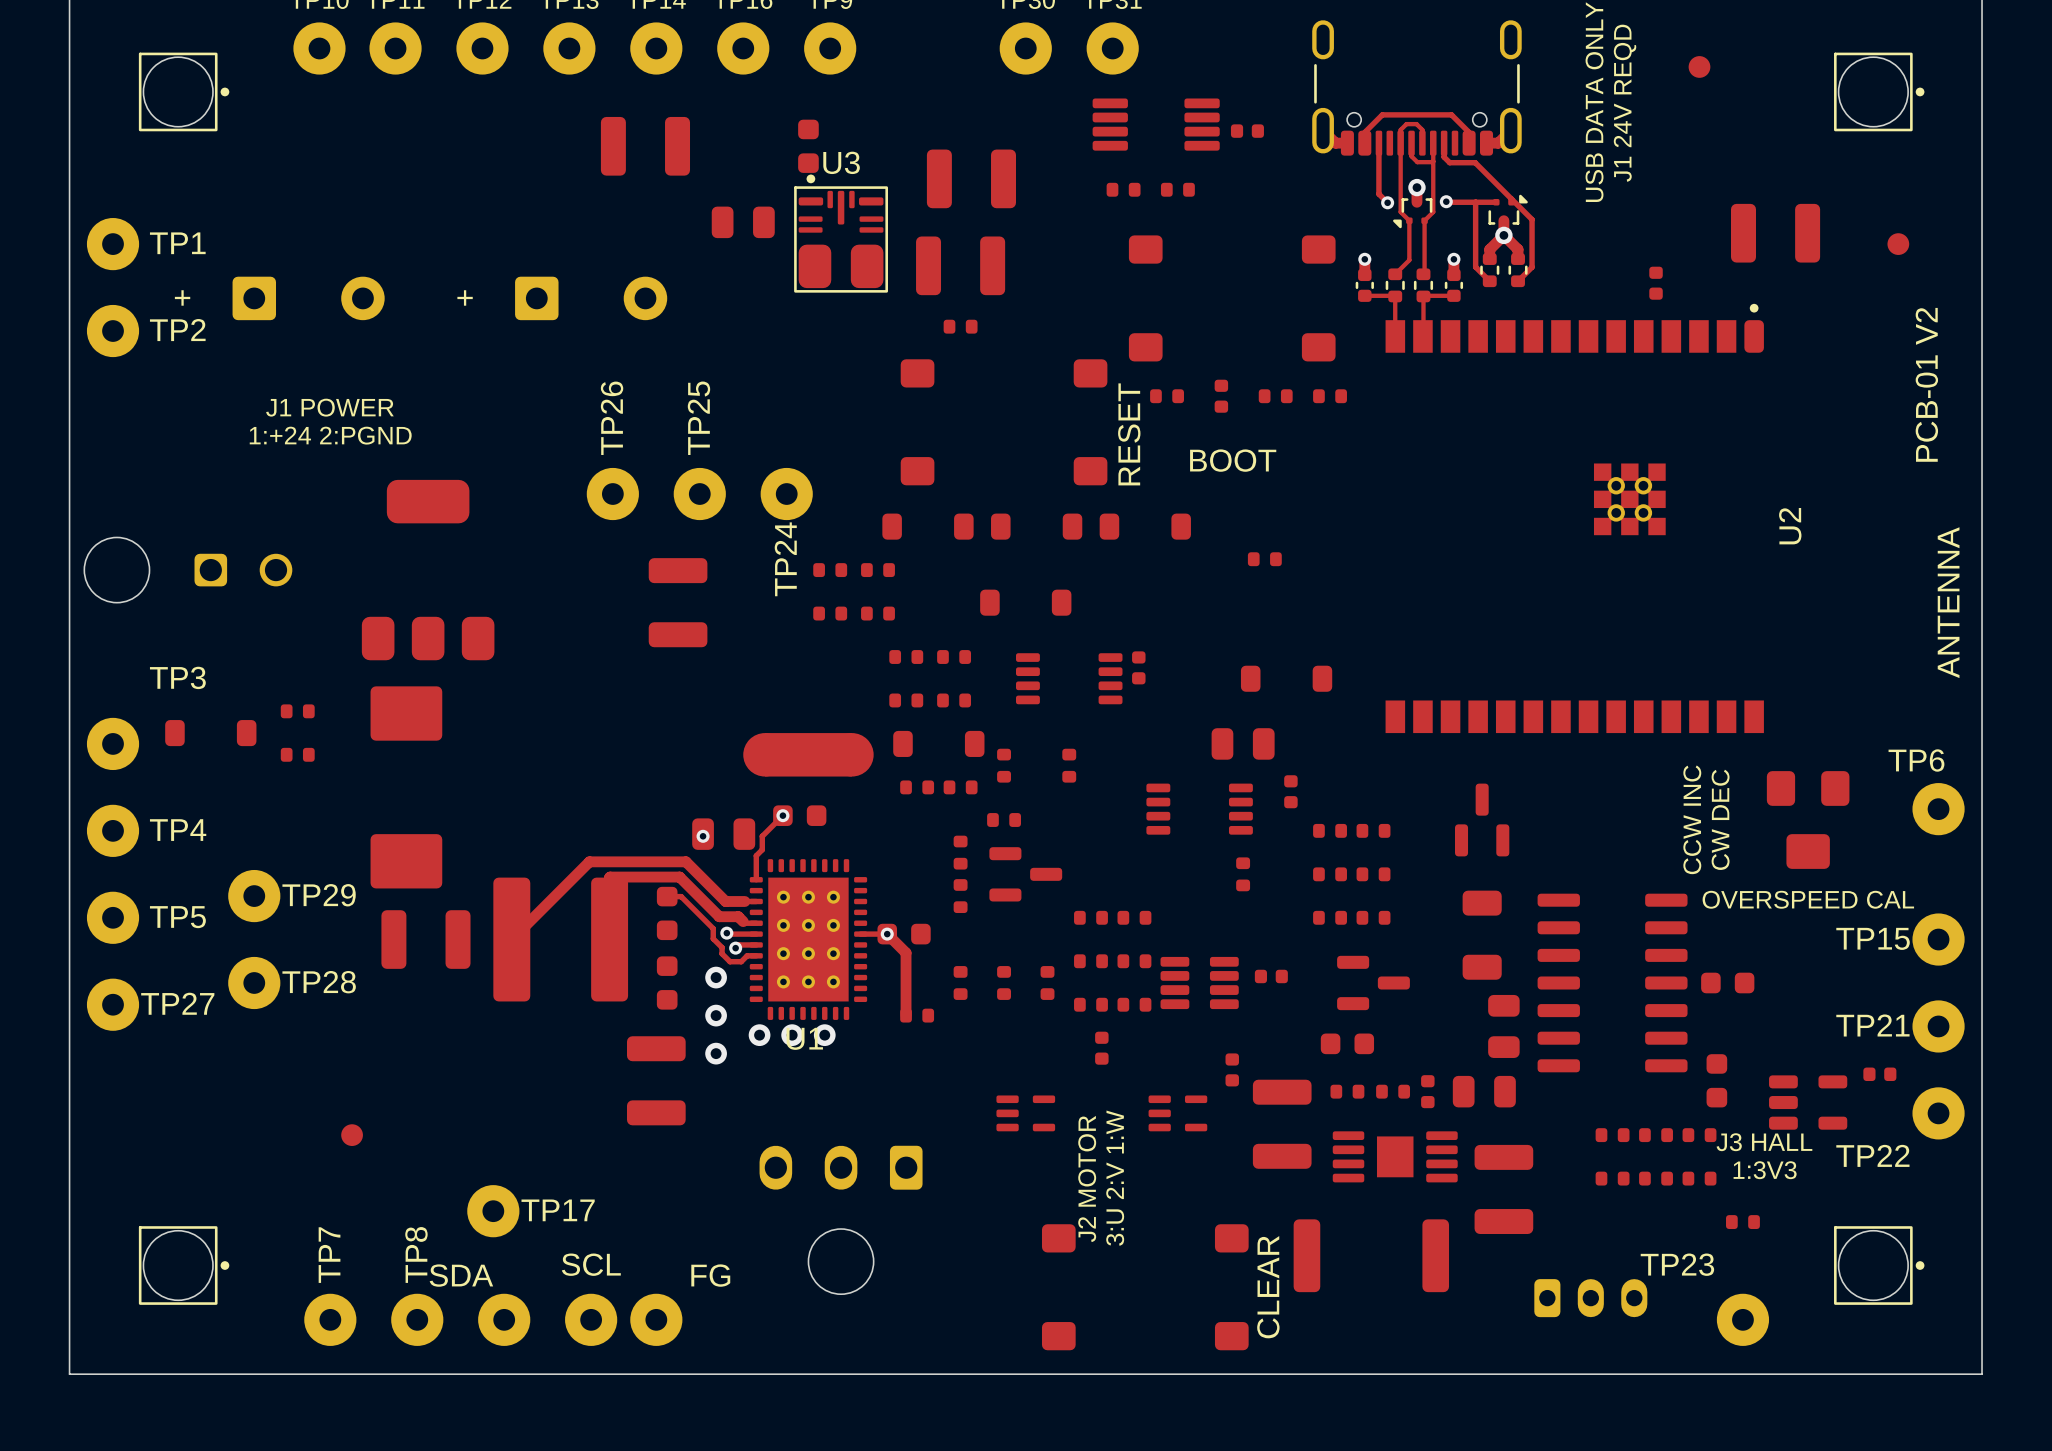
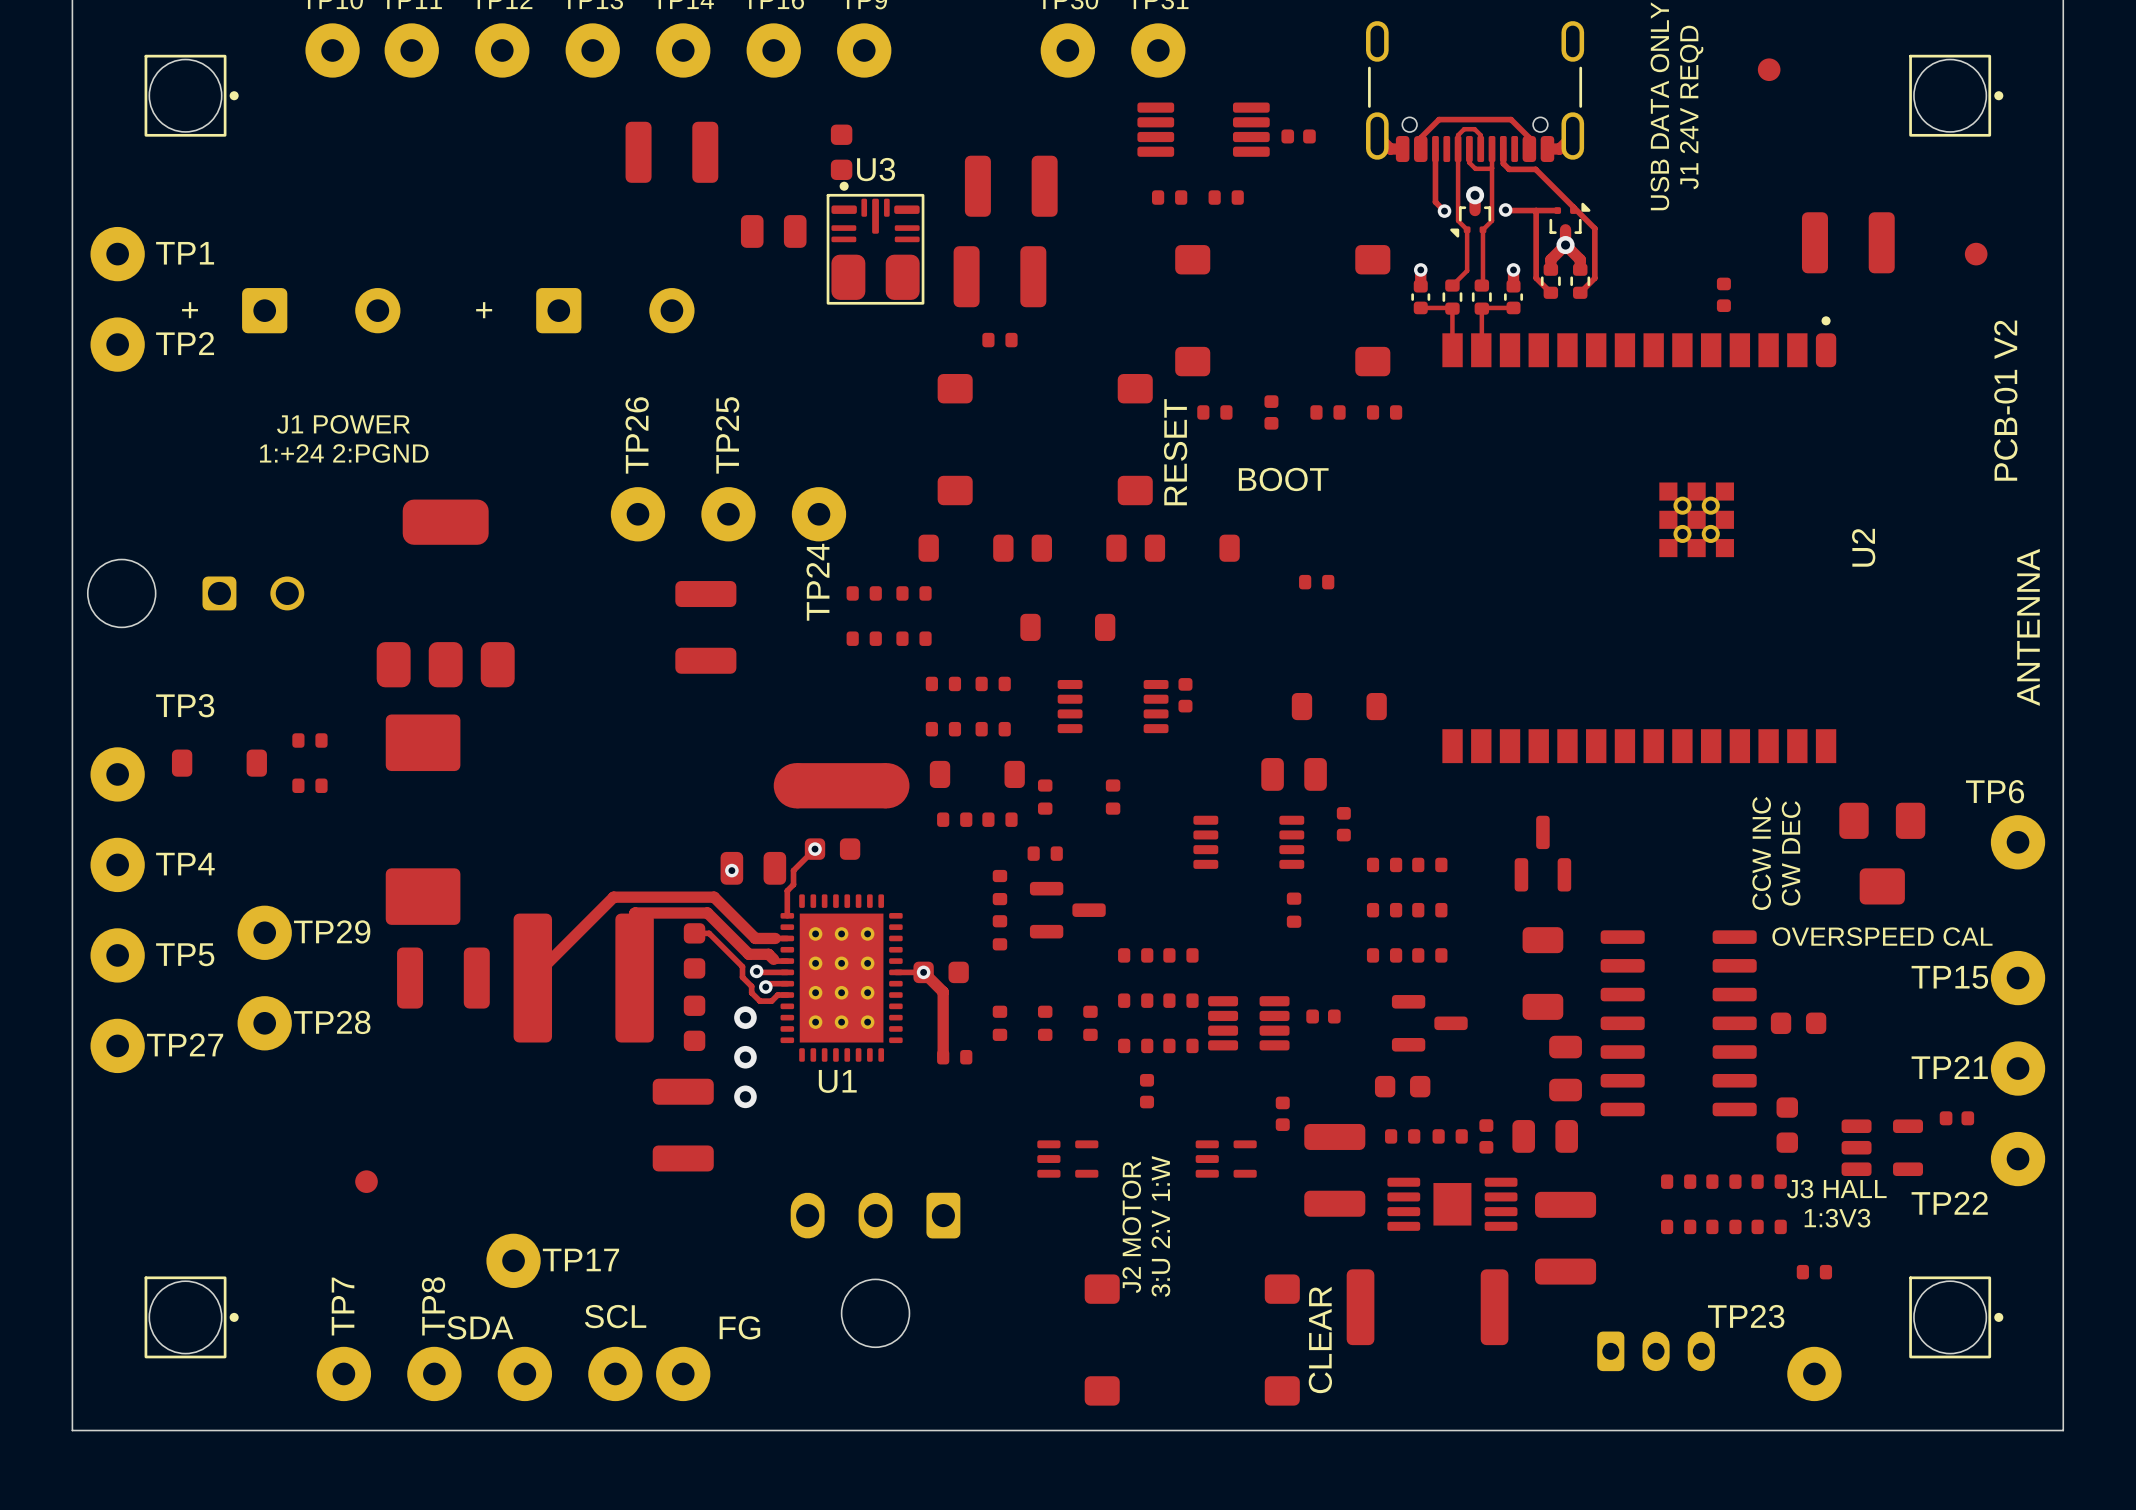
via: (759, 1035) -> none
via: (792, 1035) -> none
via: (824, 1035) -> none

